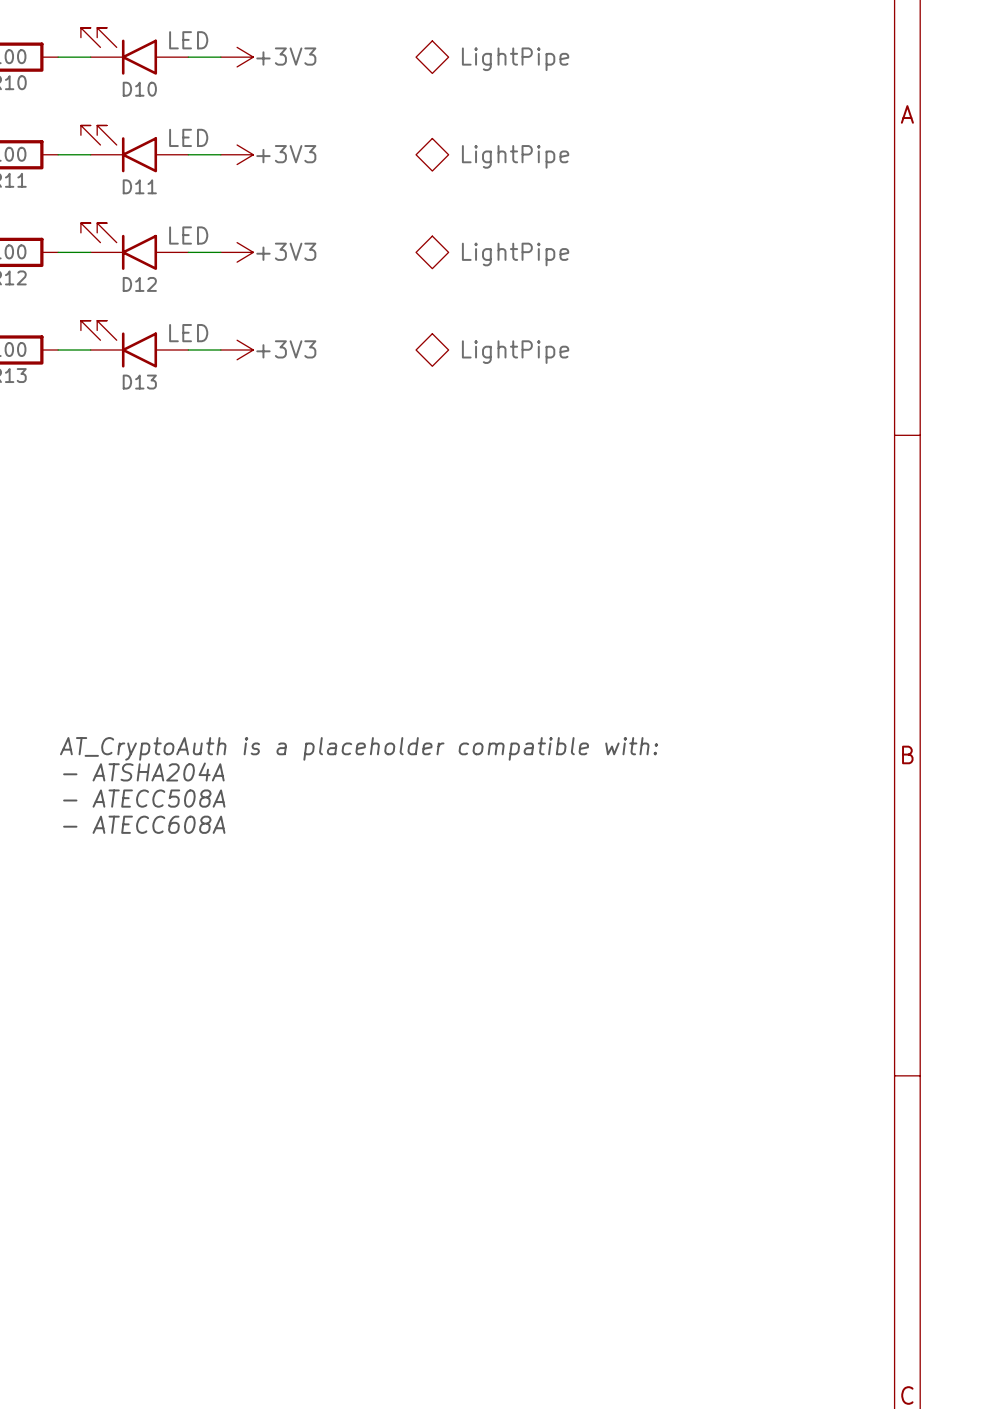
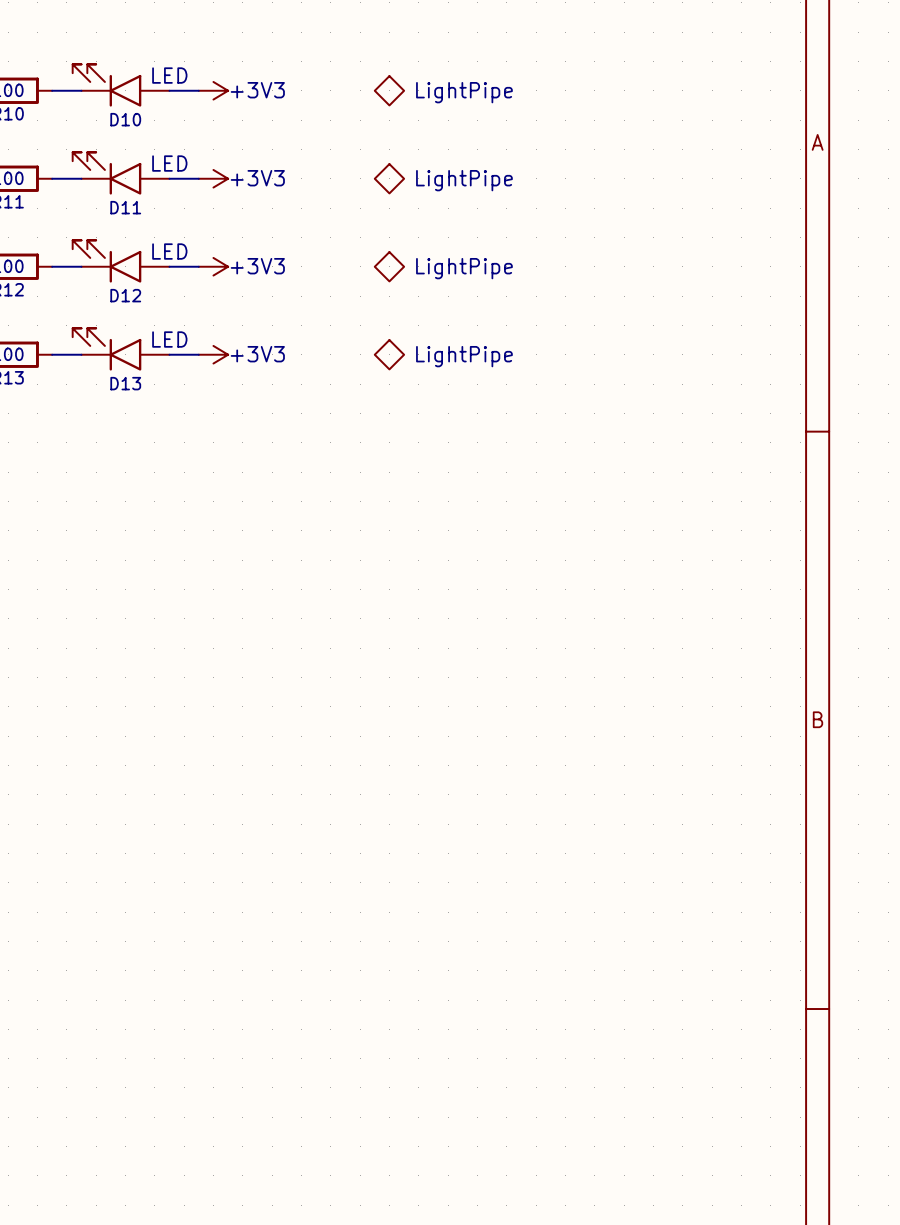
text: AT_CryptoAuth is a placeholder compatible with: (359, 748) -> none
text: - ATSHA204A (143, 771) -> none
text: - ATECC508A (144, 798) -> none
text: - ATECC608A (144, 824) -> none

